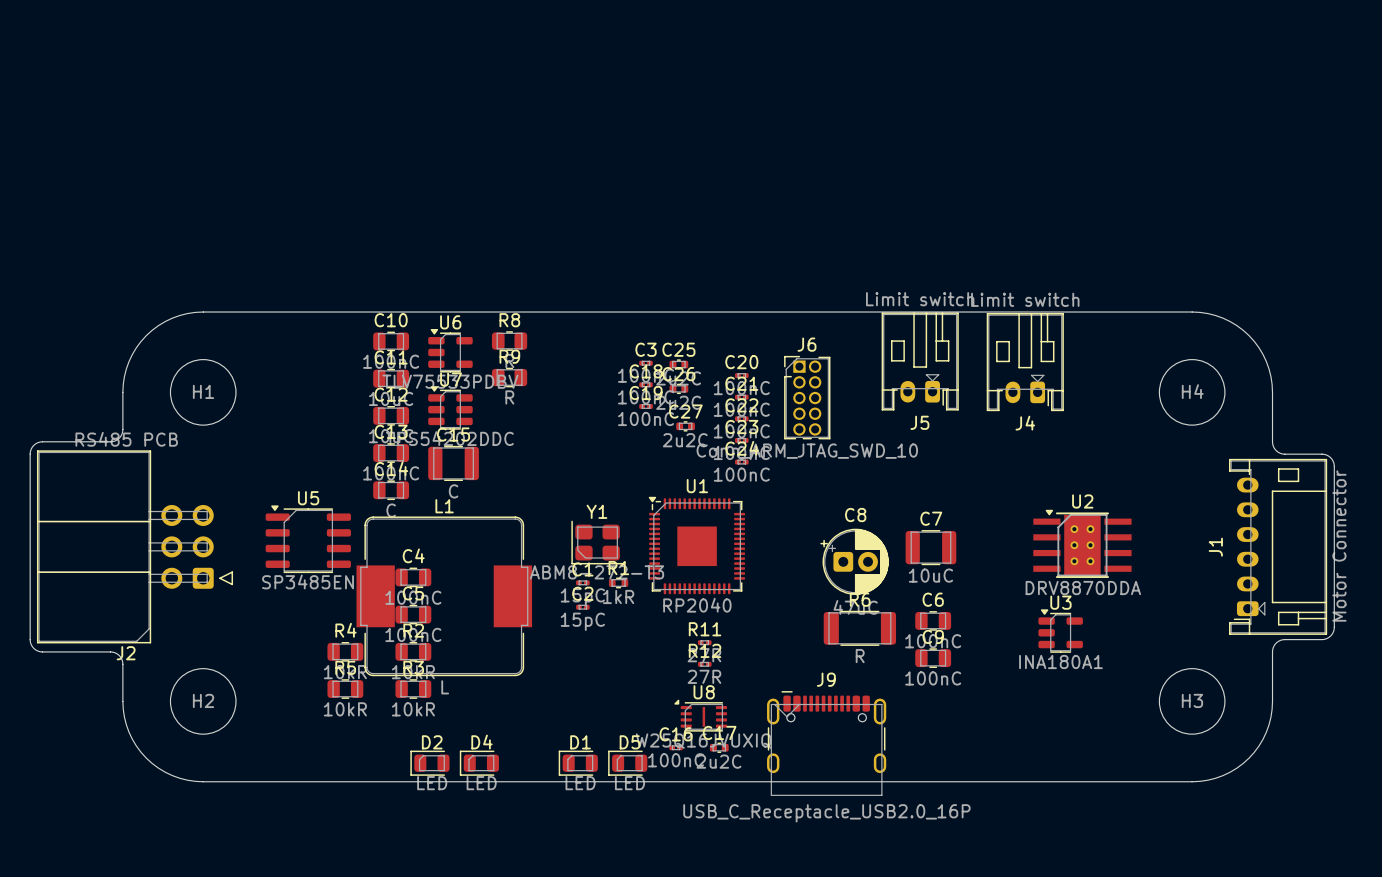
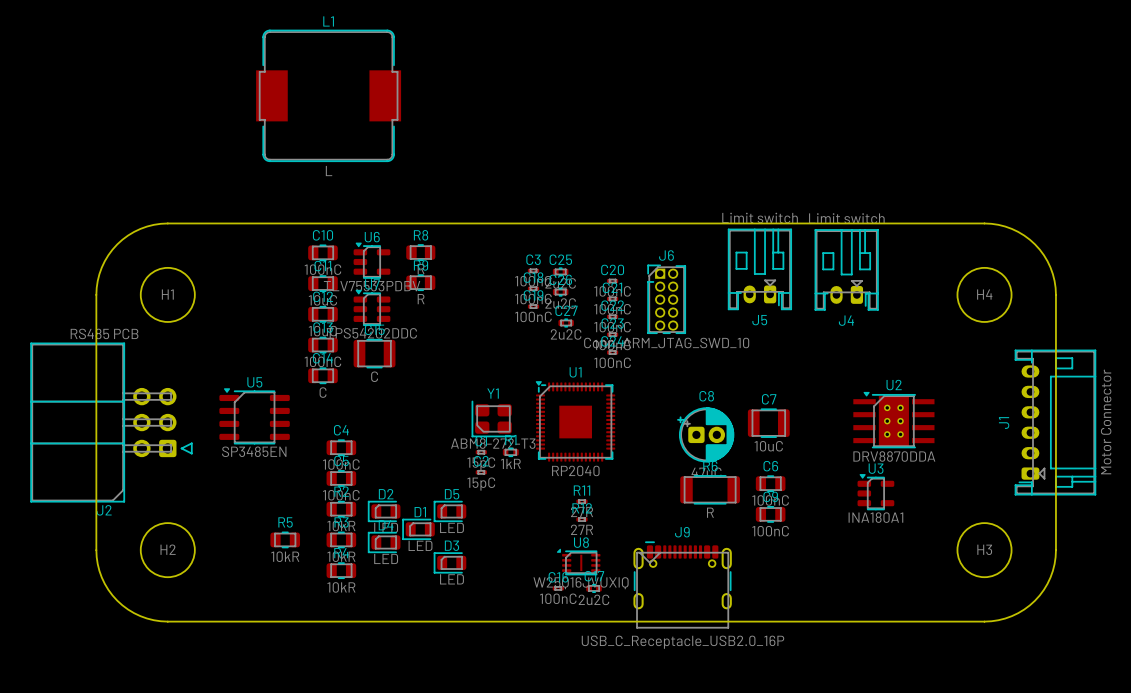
board edge: (203, 312) (1192, 312) (1215, 315) (1230, 321) (1243, 330) (1258, 347) (1266, 361) (1272, 384) (1272, 441) (1275, 449) (1283, 454) (1324, 454) (1329, 456) (1333, 462) (1334, 629) (1330, 635) (1324, 639) (1283, 639) (1275, 644) (1272, 651) (1272, 709) (1269, 724) (1263, 739) (1254, 752) (1236, 768) (1222, 775) (1200, 781) (203, 781) (179, 778) (165, 772) (152, 763) (141, 752) (132, 739) (124, 717) (122, 662) (119, 655) (110, 651) (41, 651) (34, 649) (31, 644) (30, 454) (32, 446) (39, 442) (110, 441) (118, 439) (122, 430) (124, 376) (128, 361) (136, 347) (146, 335) (165, 321) (187, 313) (203, 312) -> (167, 223) (140, 228) (117, 244) (104, 261) (96, 287) (96, 557) (99, 570) (108, 589) (122, 605) (140, 616) (167, 621) (984, 621) (1005, 618) (1024, 609) (1039, 595) (1050, 577) (1055, 550) (1055, 287) (1052, 274) (1043, 255) (1029, 239) (1011, 228) (984, 223) (167, 223)
L1 position: (444, 596) -> (328, 95)
R4 position: (345, 651) -> (341, 570)
D3: none -> LED (450, 562)
D2 position: (429, 763) -> (384, 511)
D4 position: (479, 763) -> (384, 542)
D1 position: (578, 763) -> (418, 529)
D5 position: (627, 763) -> (450, 511)

